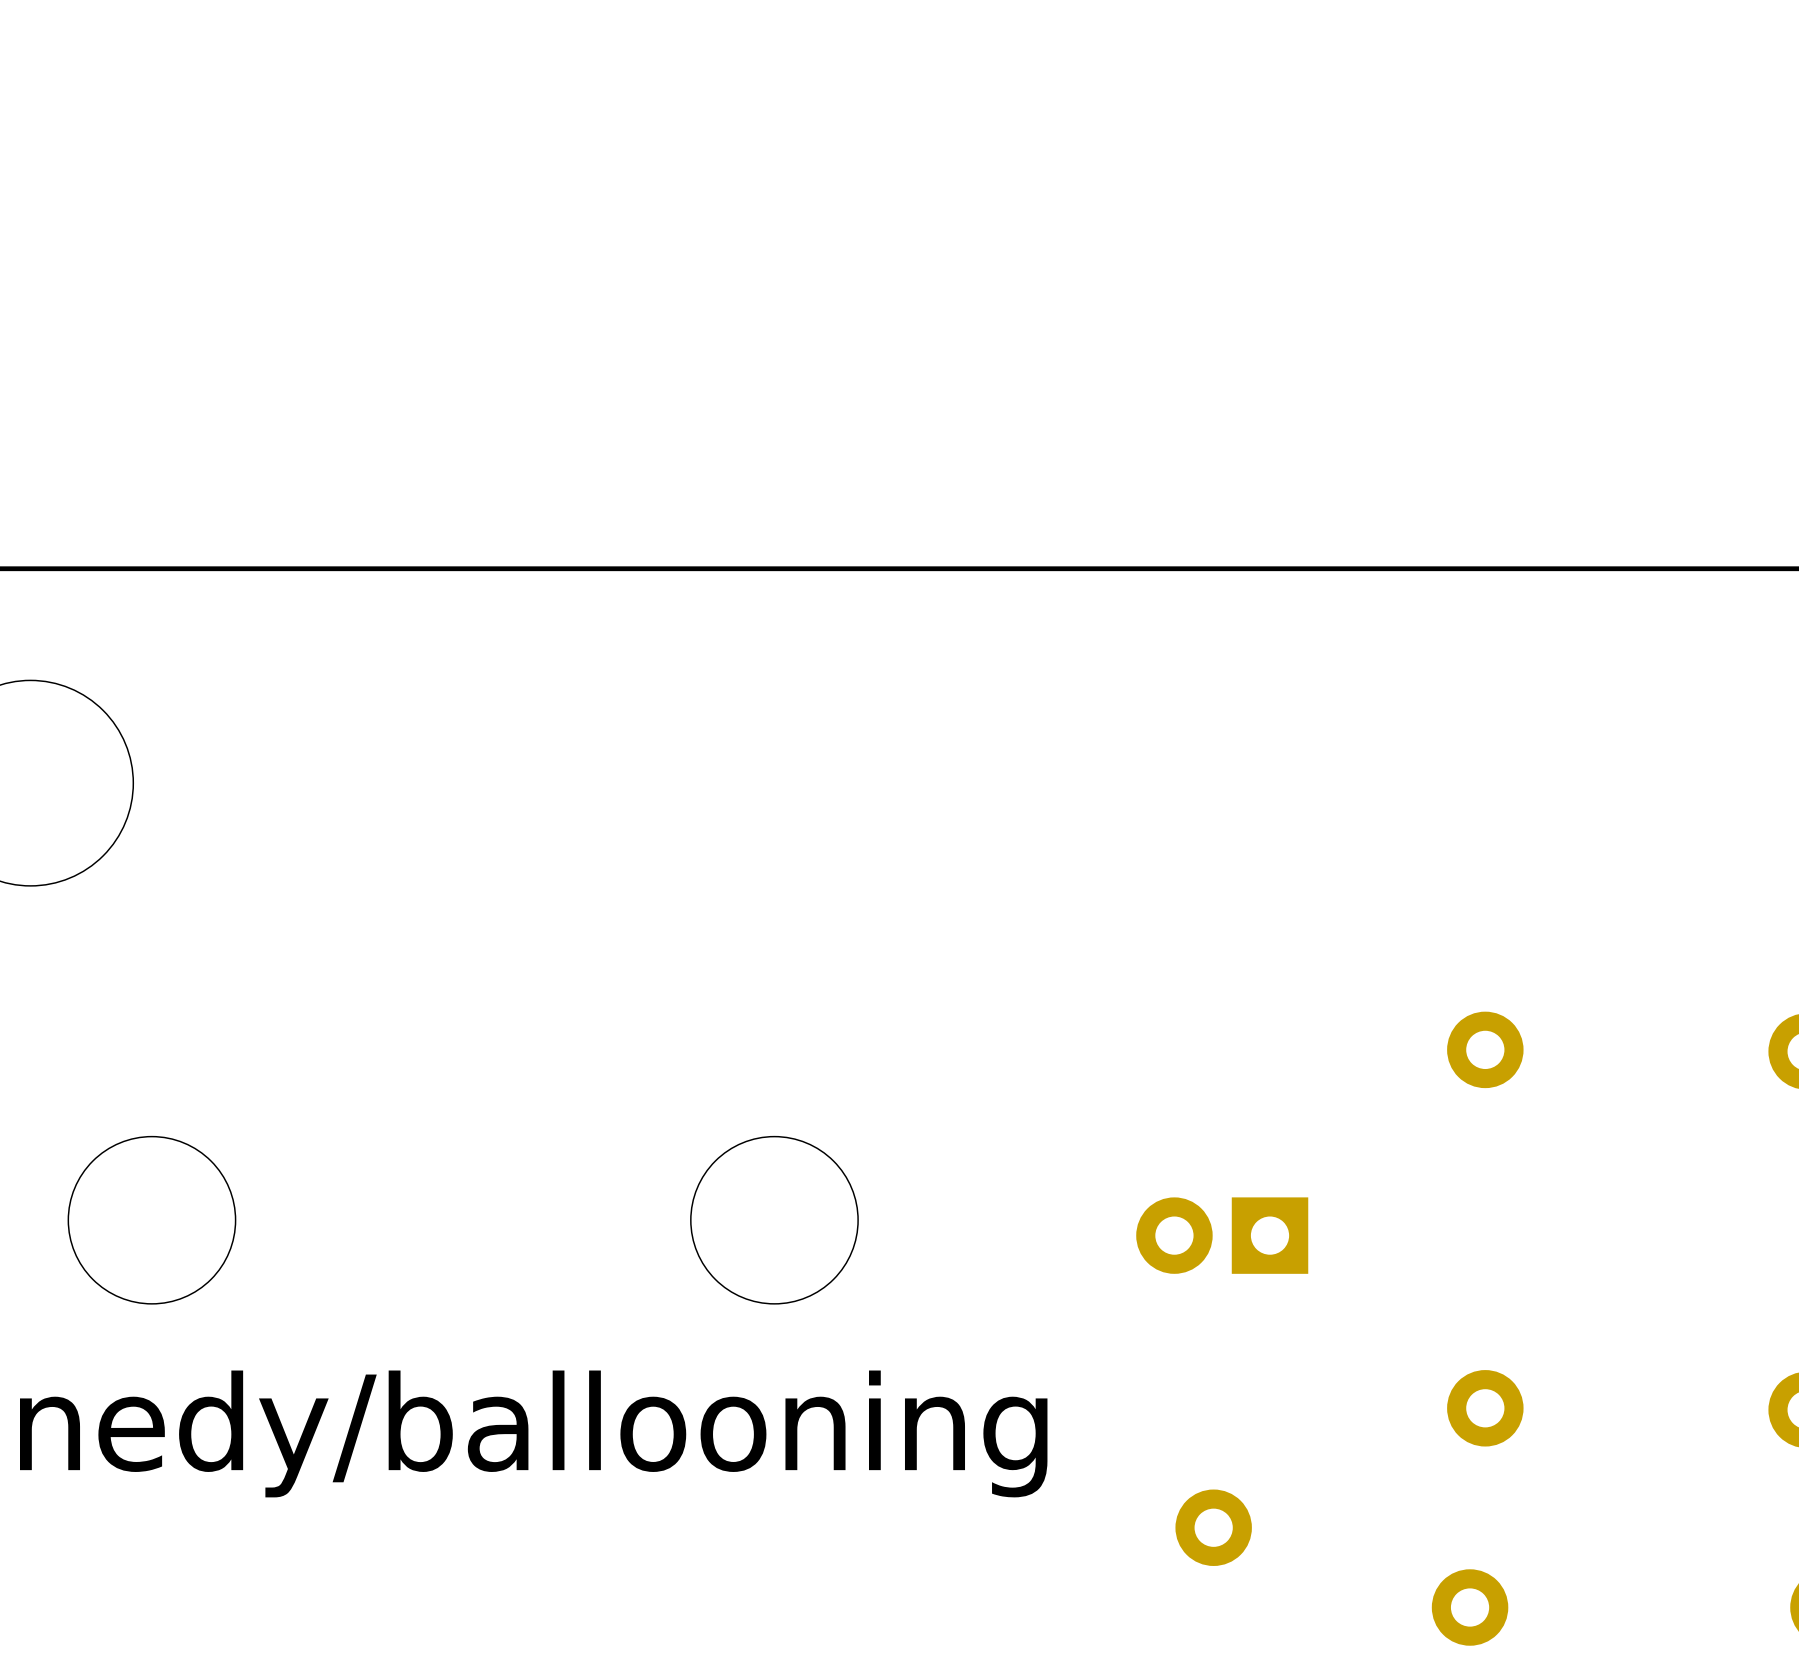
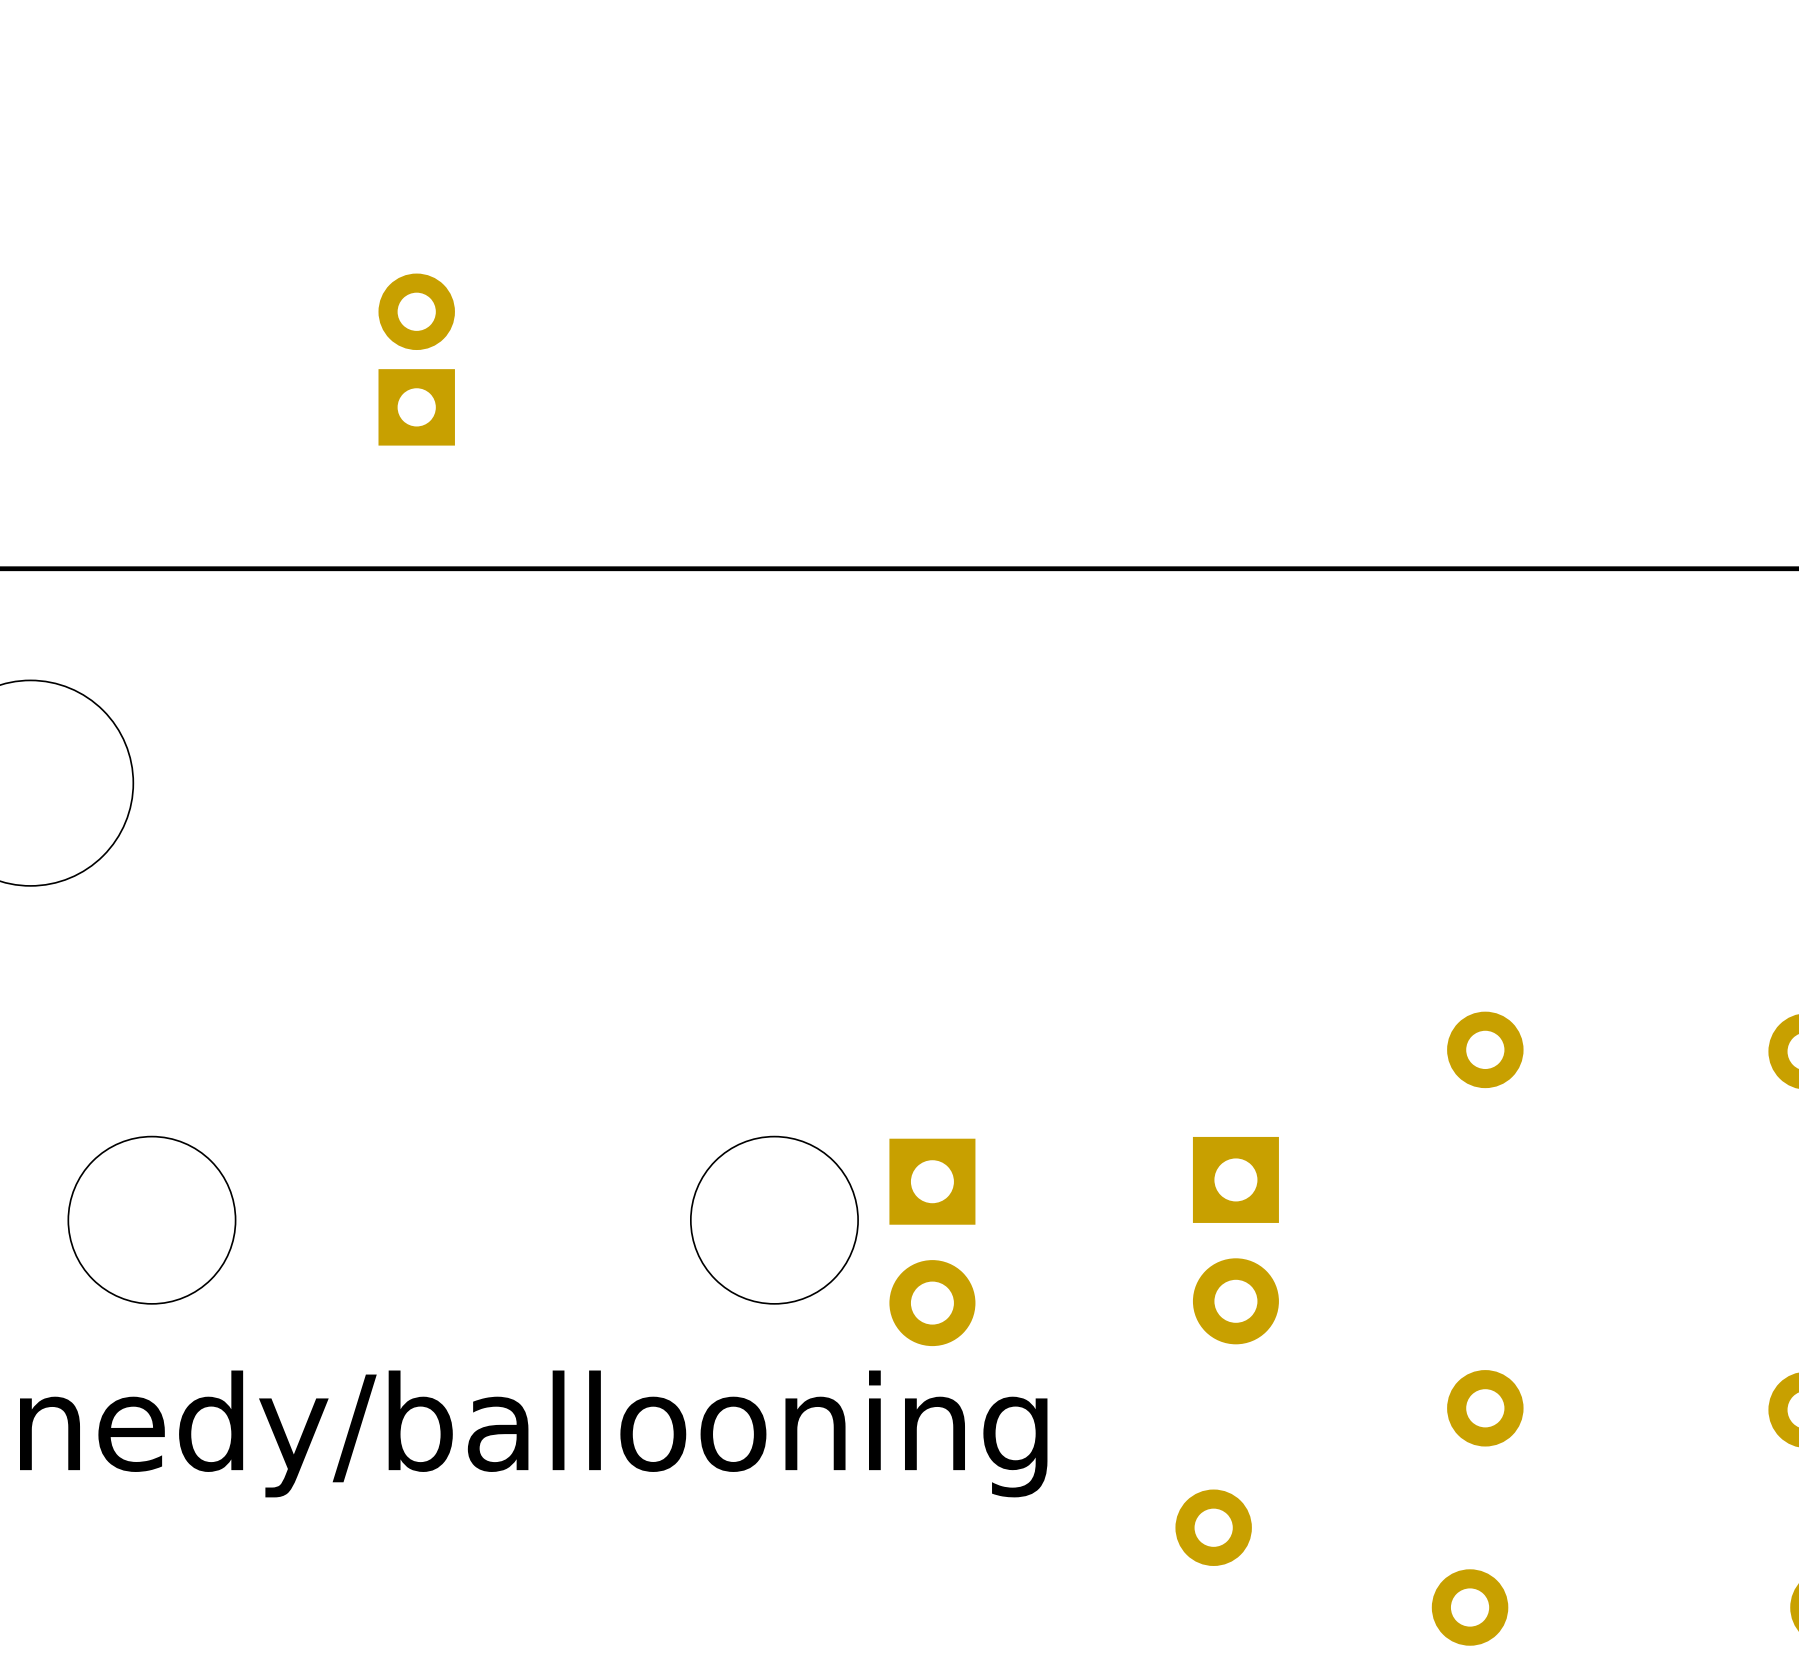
part: none -> (416, 359)
part footprint: [1136, 1197, 1309, 1274] -> [1192, 1136, 1279, 1345]
part: none -> (932, 1242)

